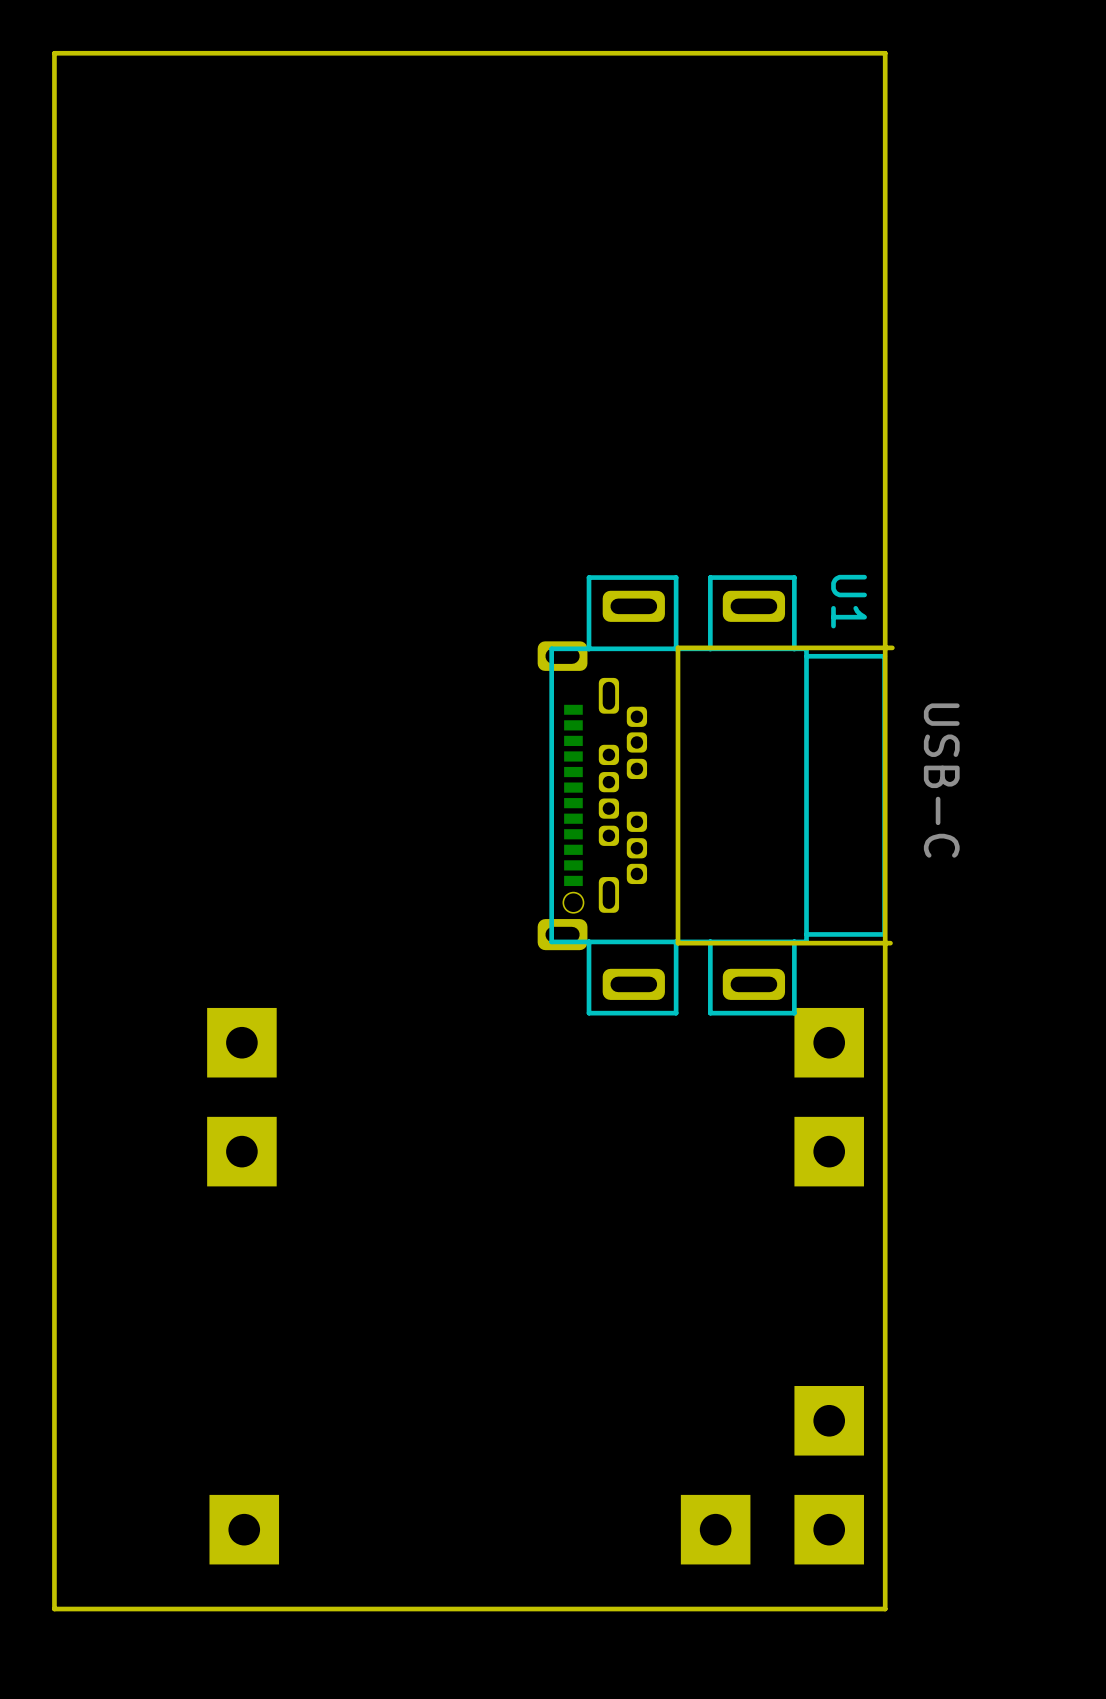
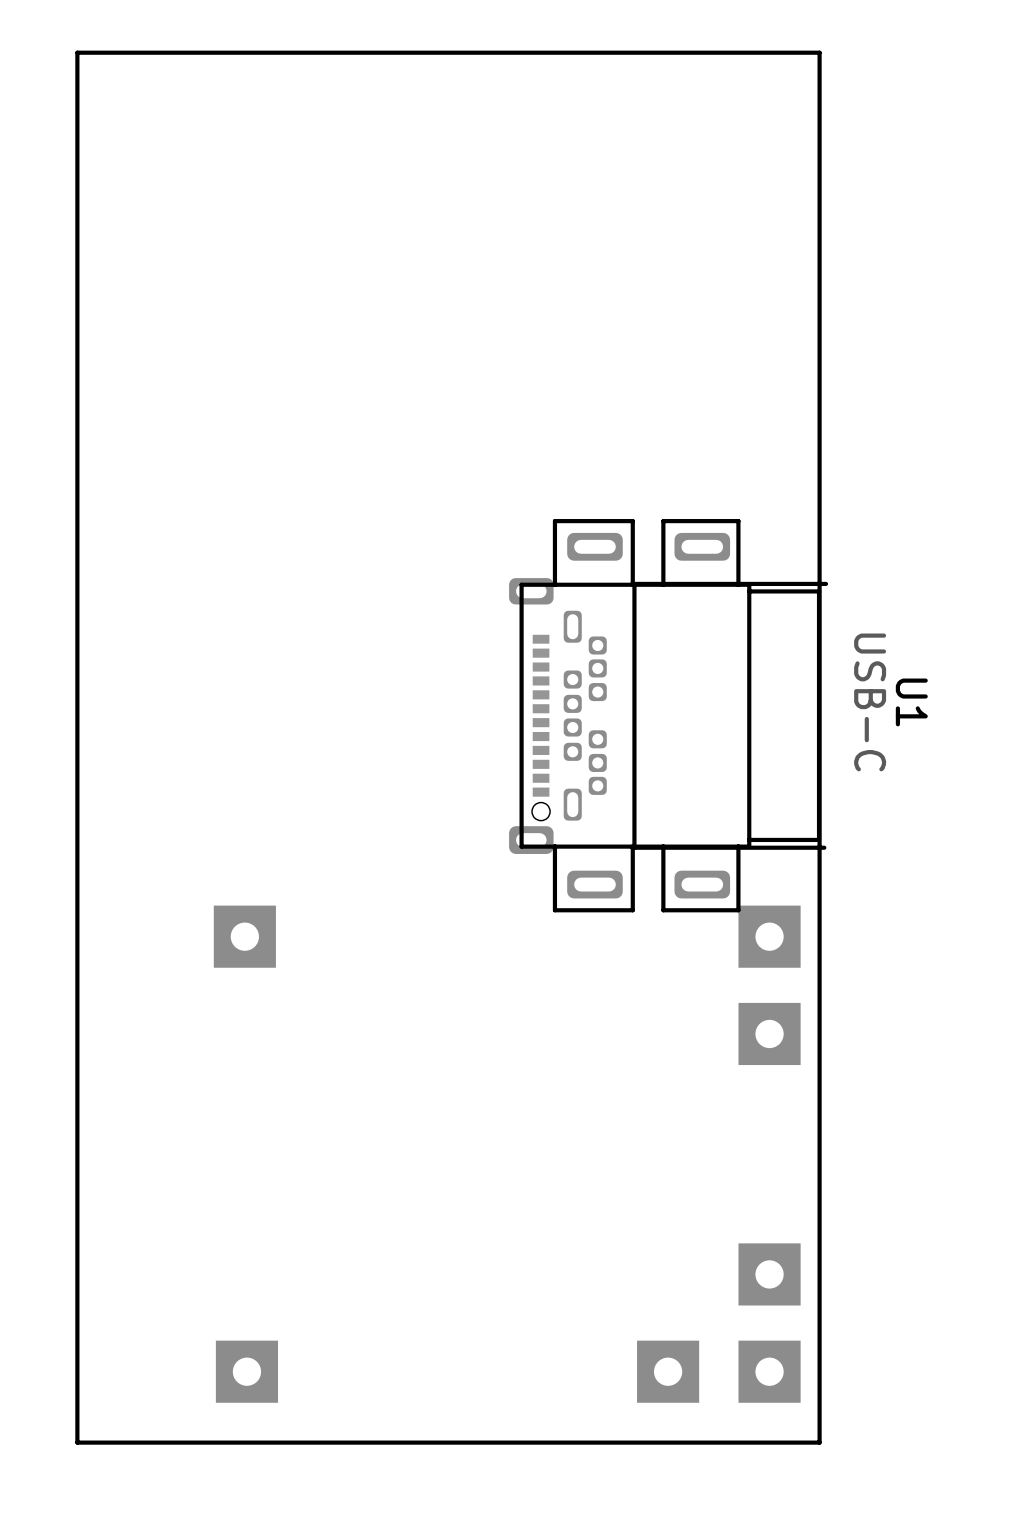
U1 name position: U1 (849, 601) -> U1 (911, 702)
part: (241, 1151) -> none

